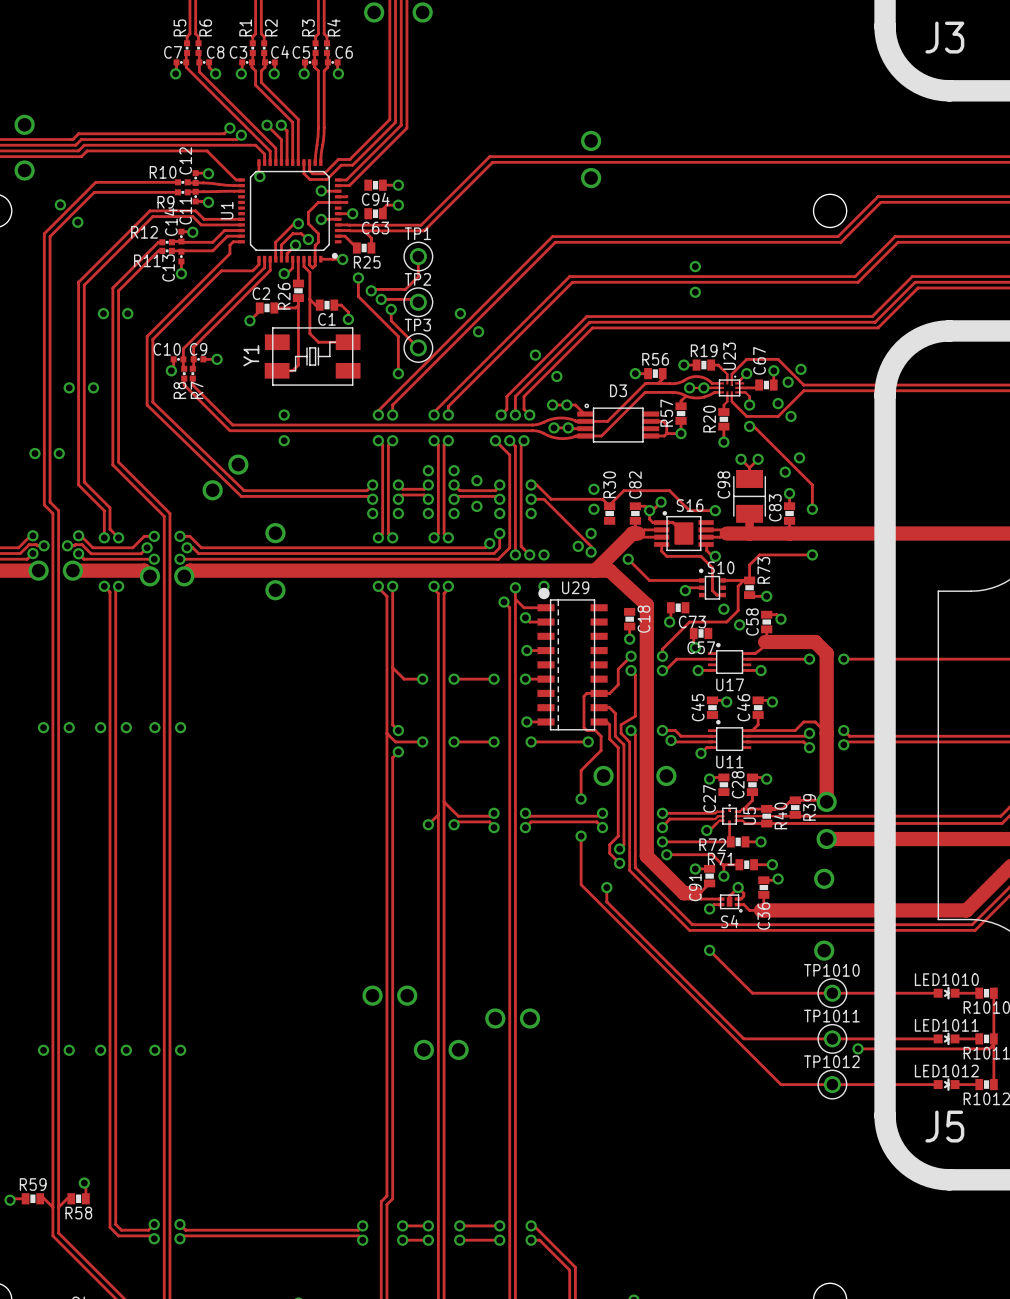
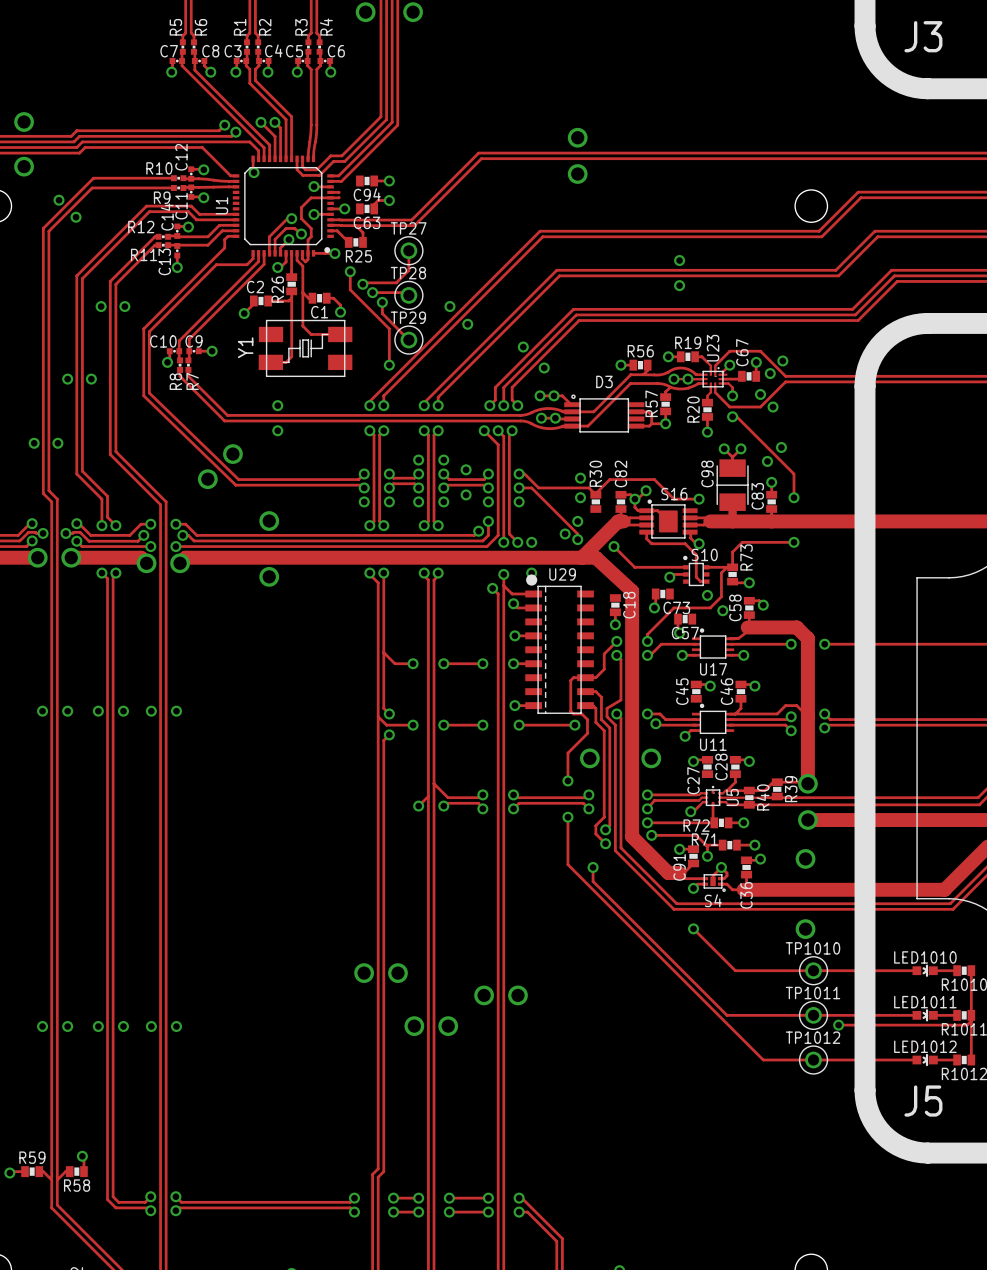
TP1 name: TP1 (417, 233) -> TP27 (408, 228)
TP2 name: TP2 (417, 279) -> TP28 (408, 273)
TP3 name: TP3 (417, 325) -> TP29 (408, 317)

